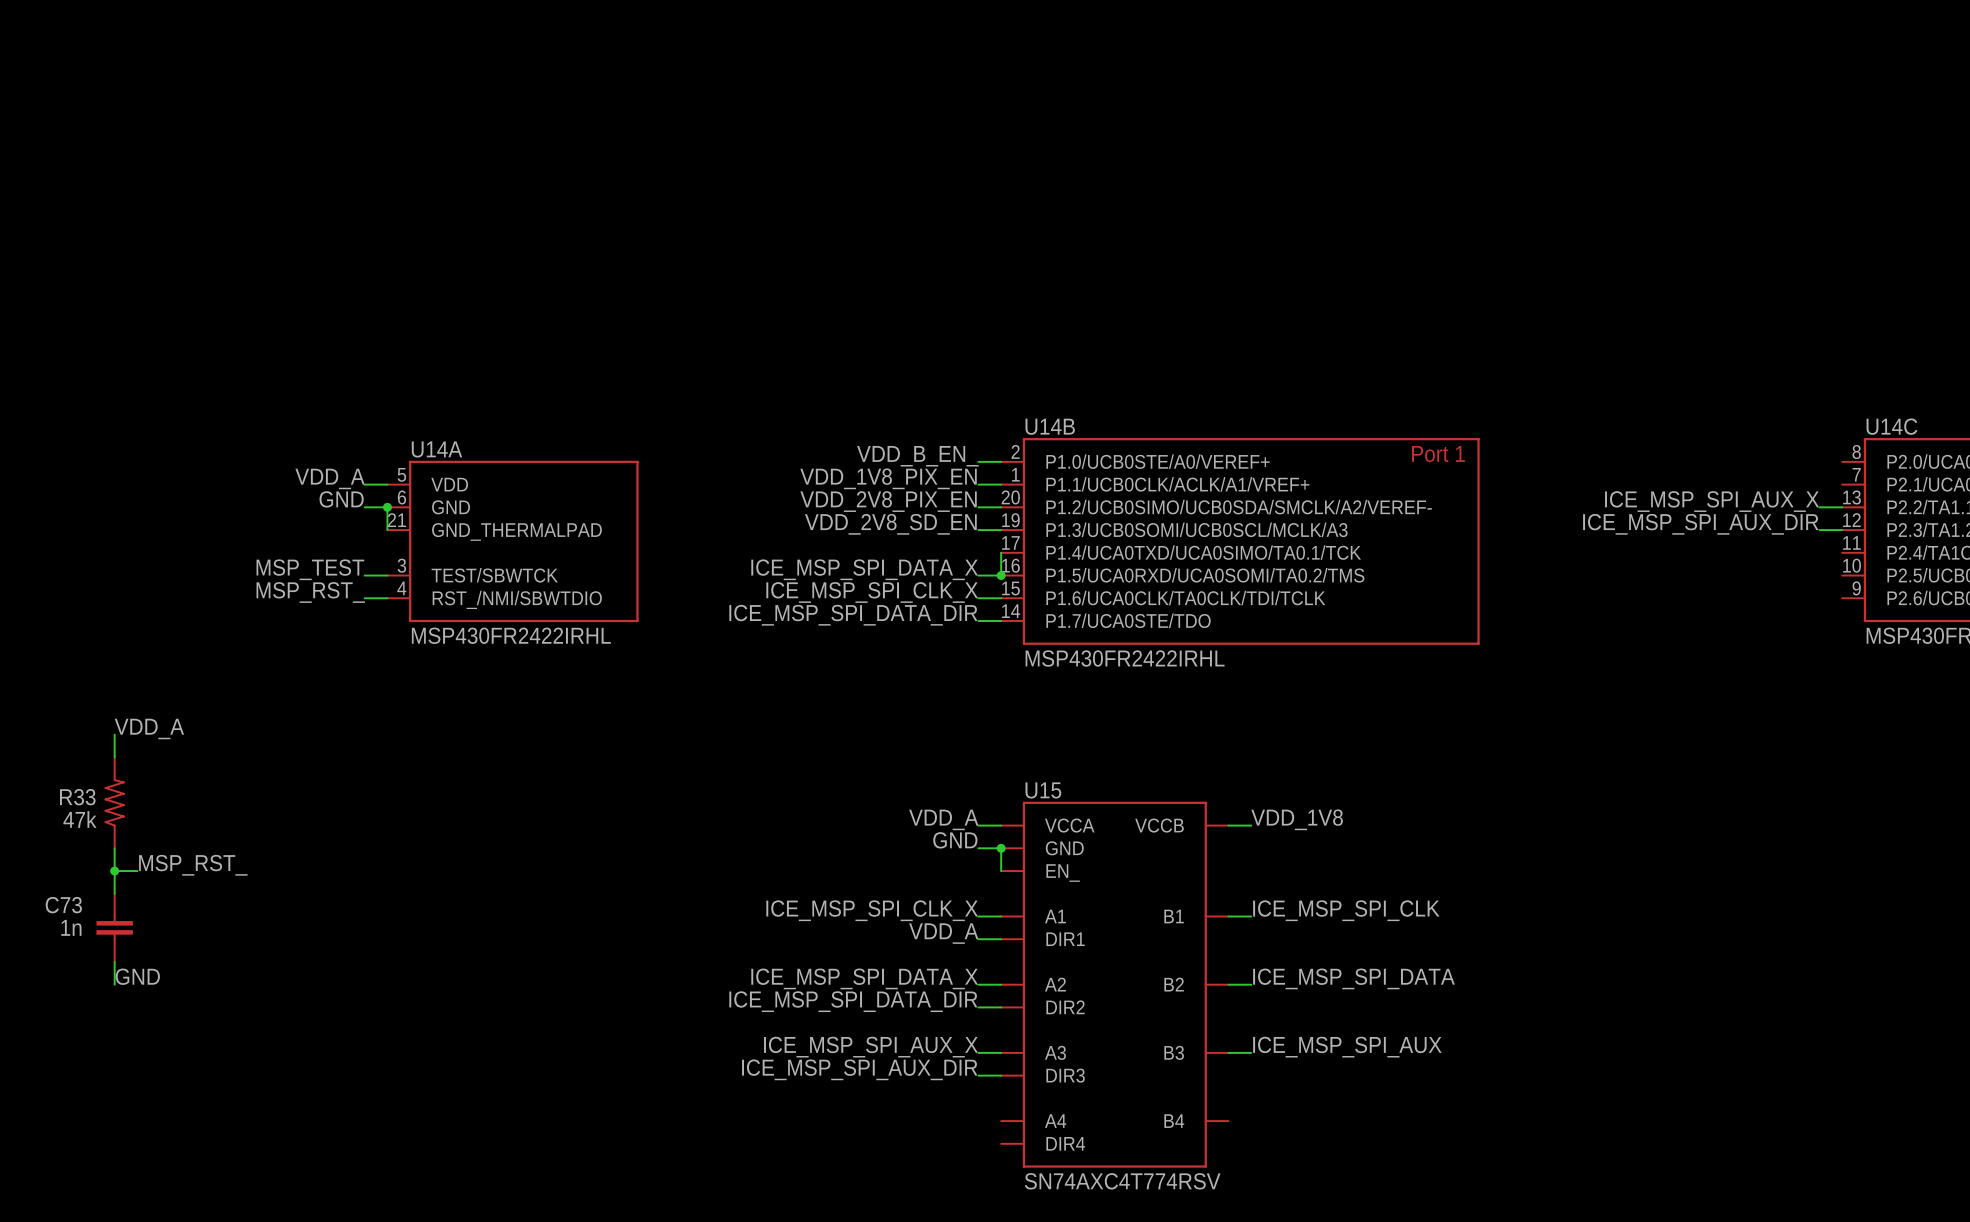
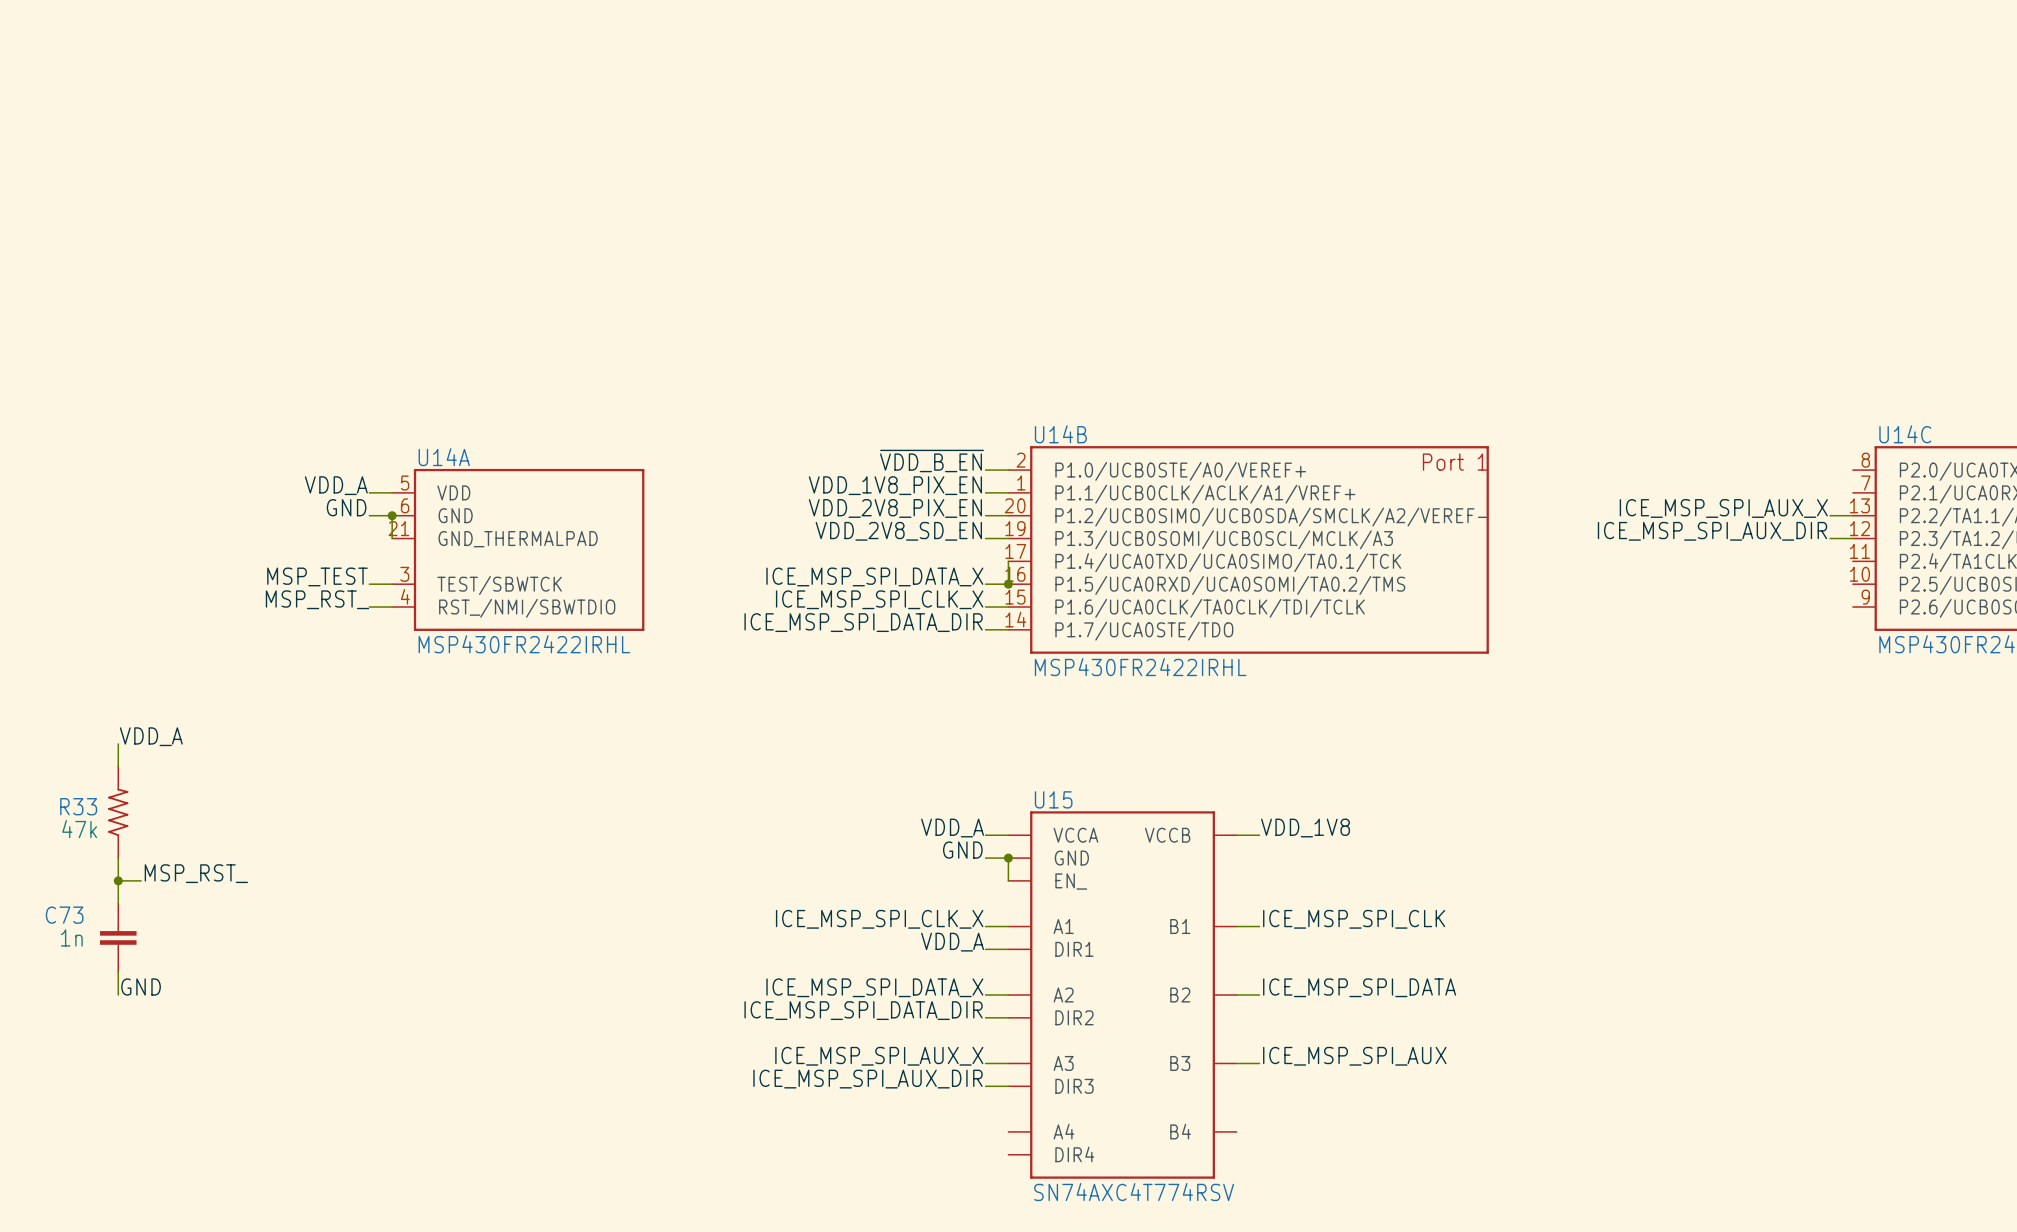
label: VDD_B_EN_ (917, 456) -> ~{VDD_B_EN} (931, 460)

